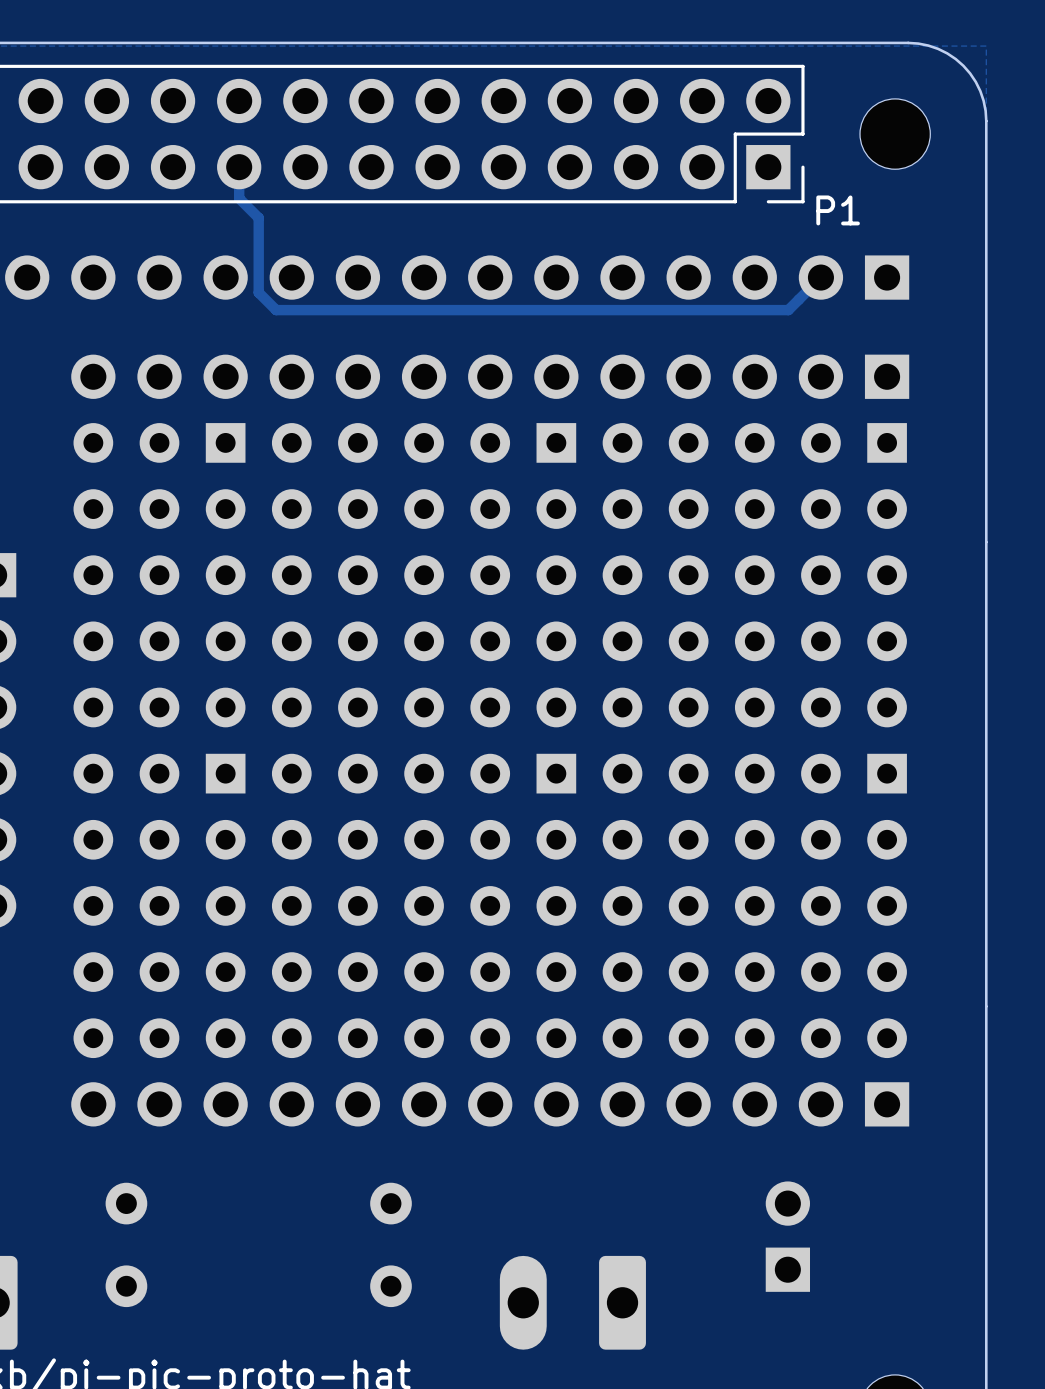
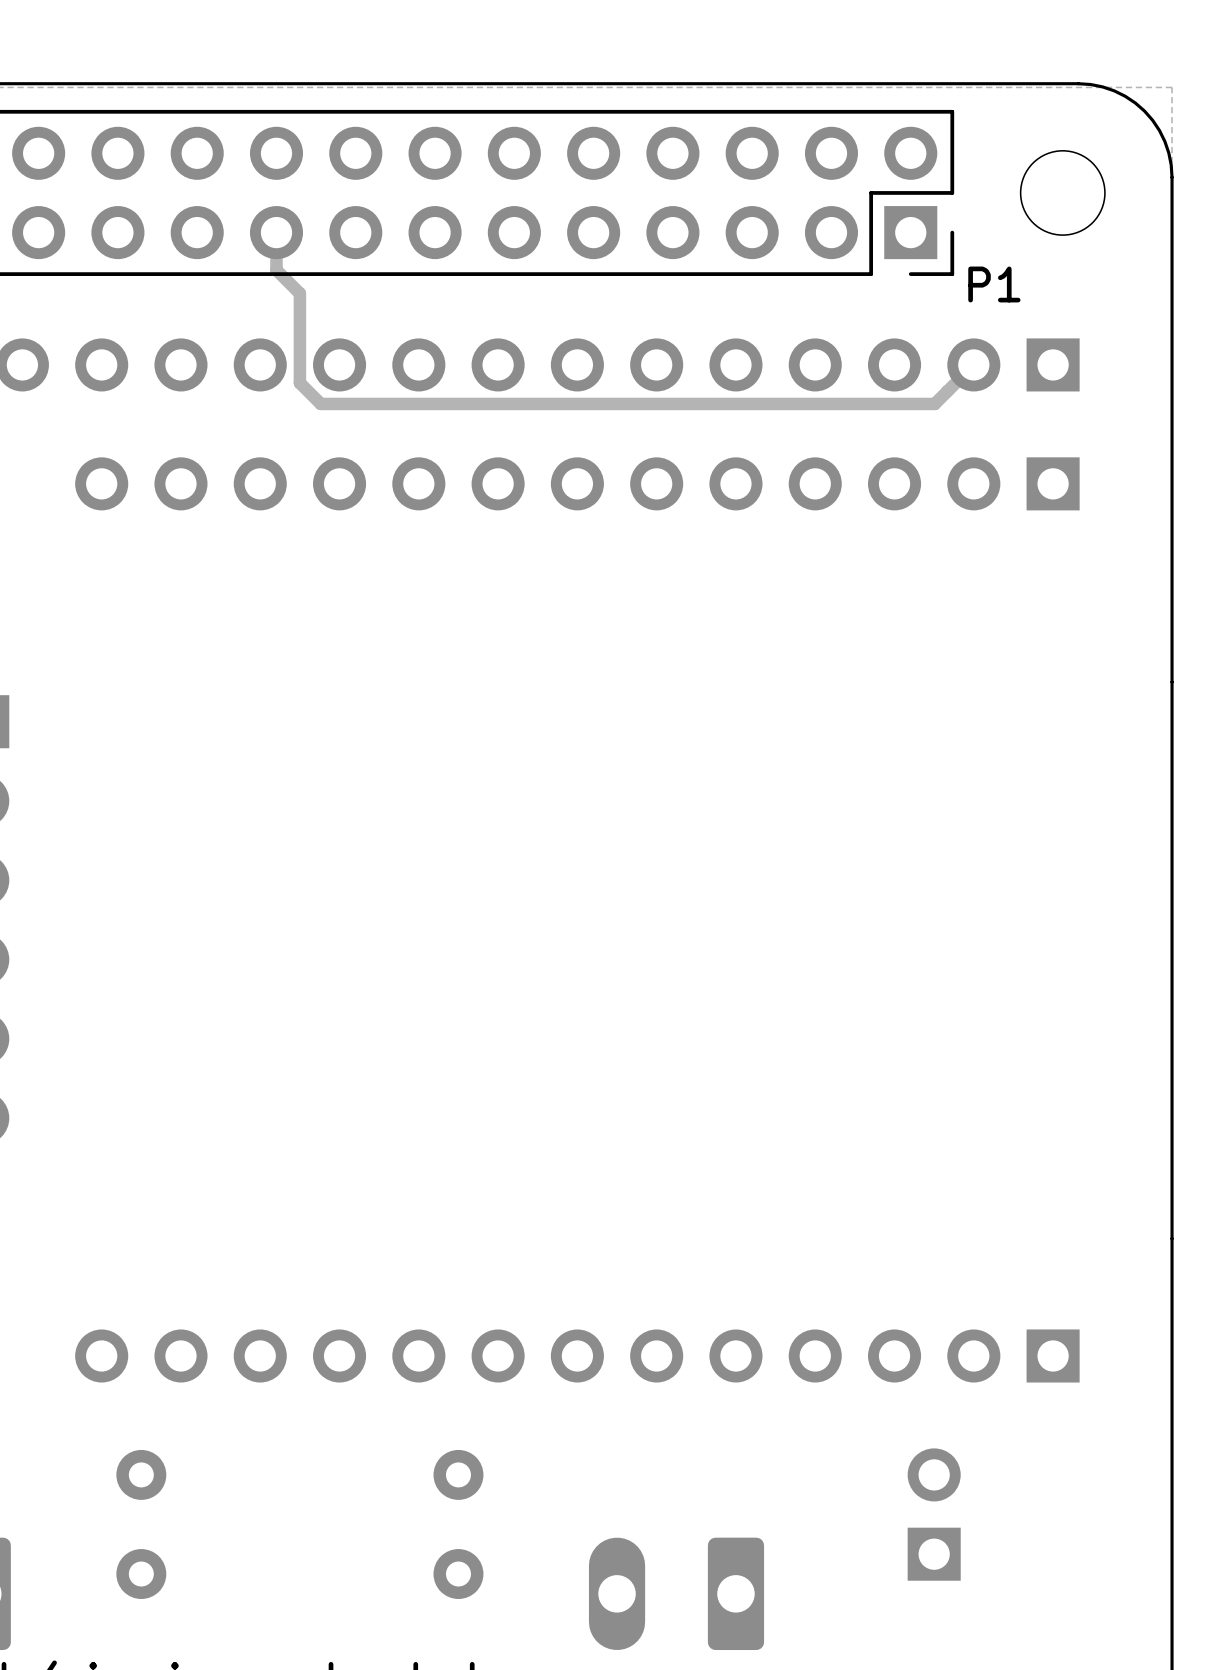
part: (159, 575) -> none
part: (424, 575) -> none
part: (754, 575) -> none
part: (159, 905) -> none
part: (424, 905) -> none
part: (754, 905) -> none

